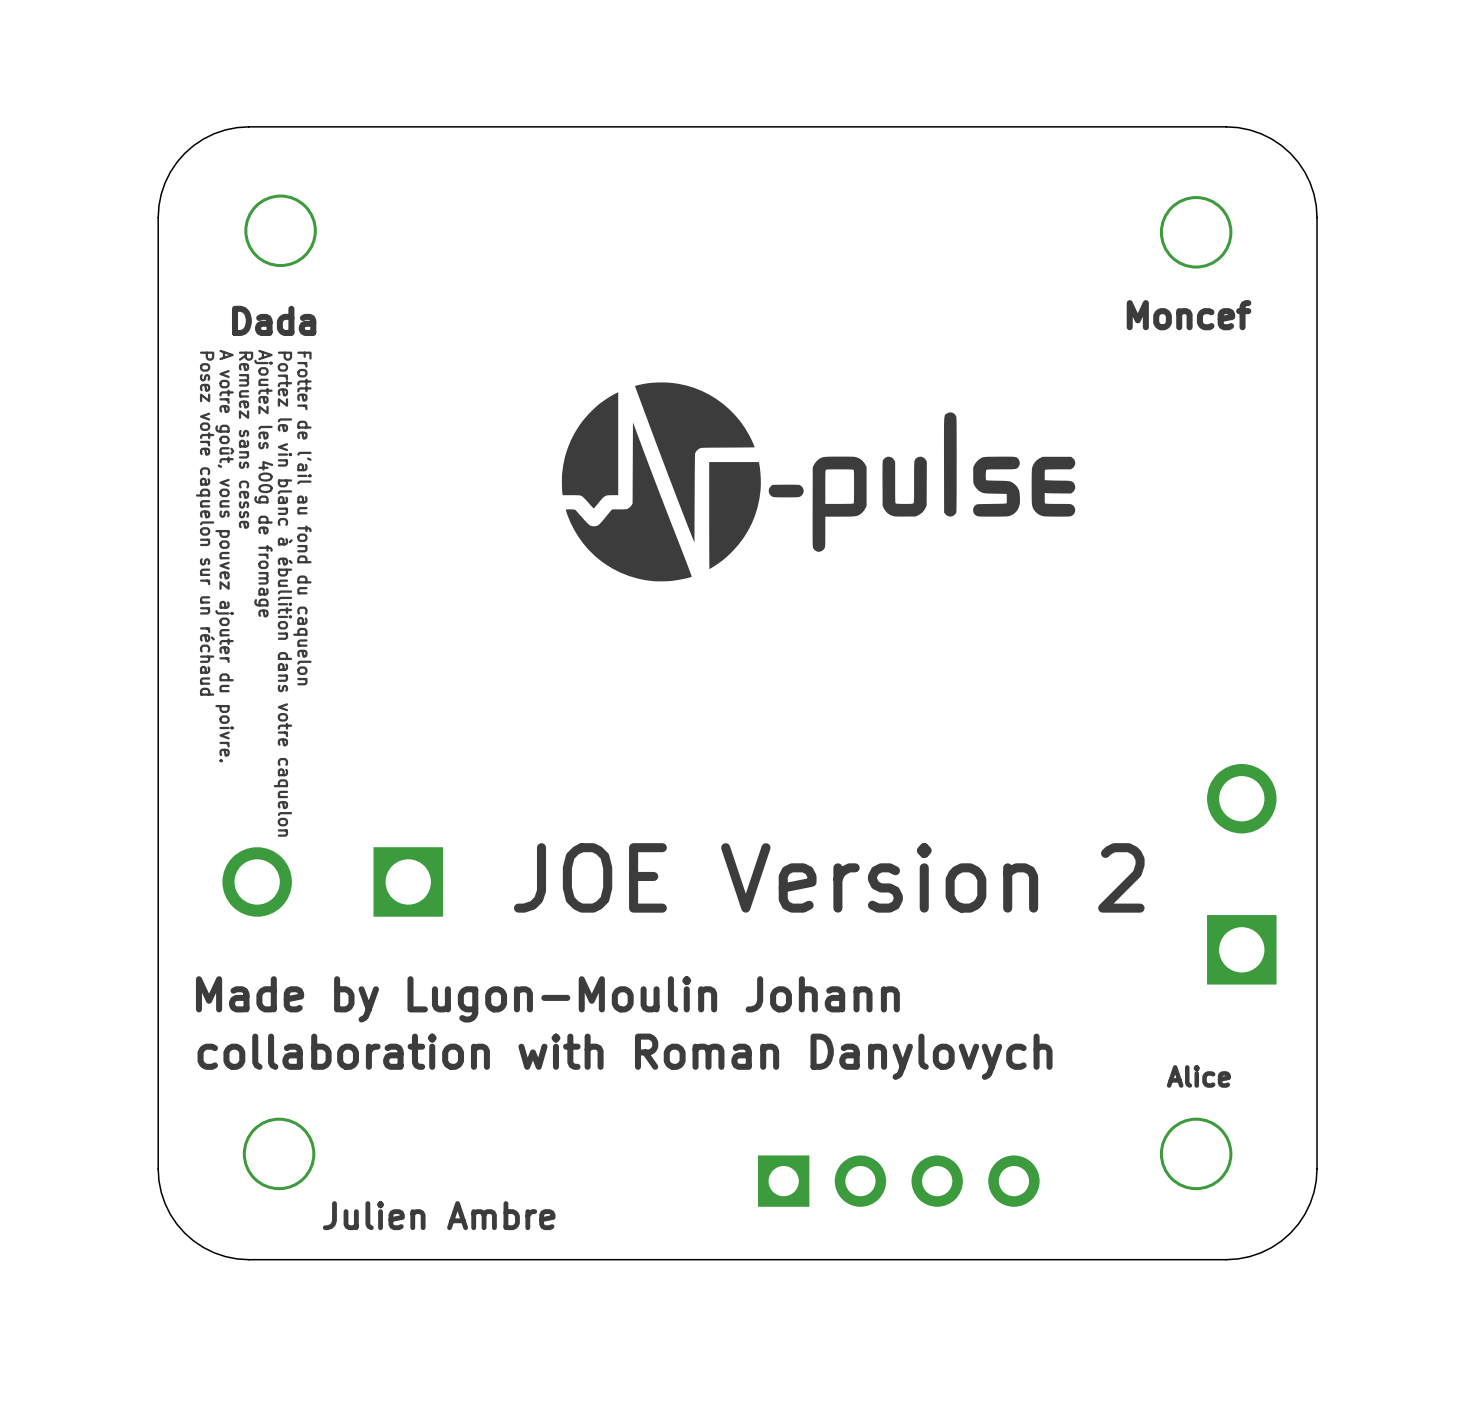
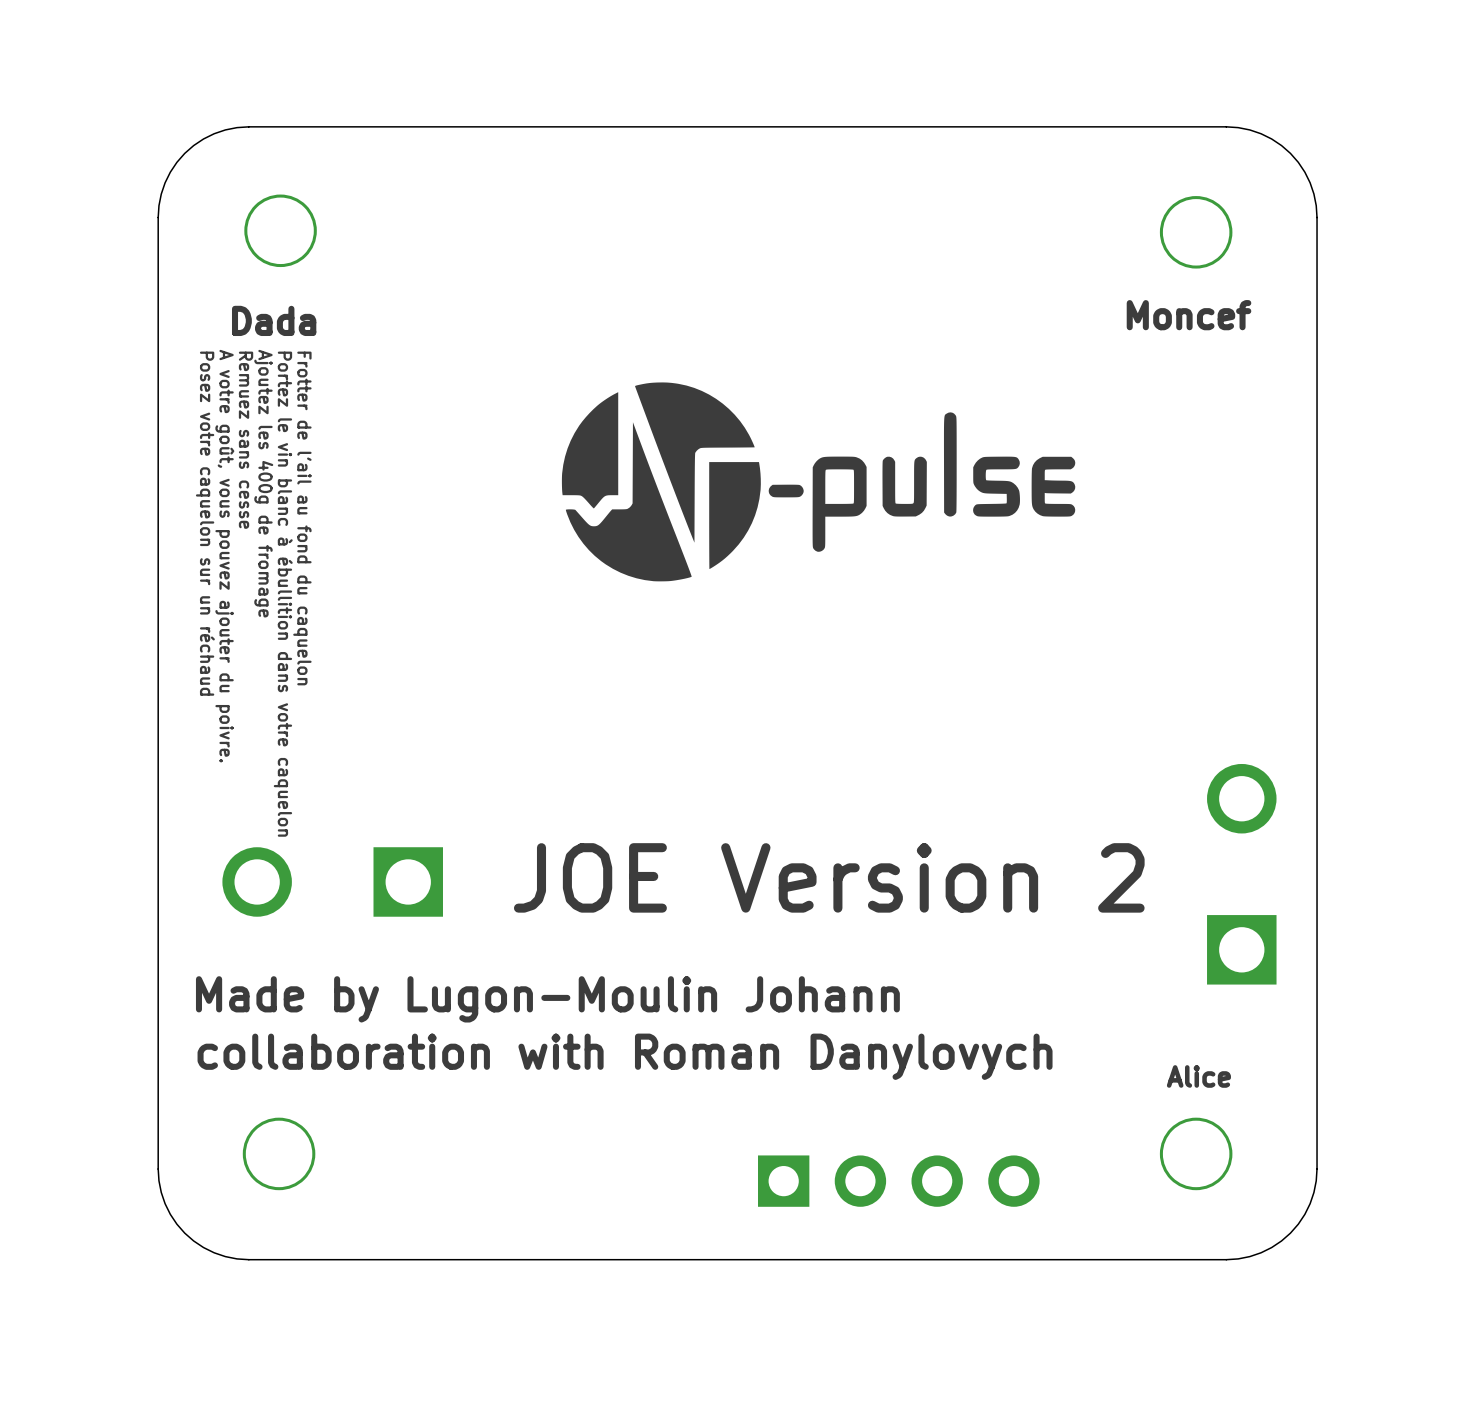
text: Julien (374, 1215) -> none
text: Ambre (501, 1215) -> none

